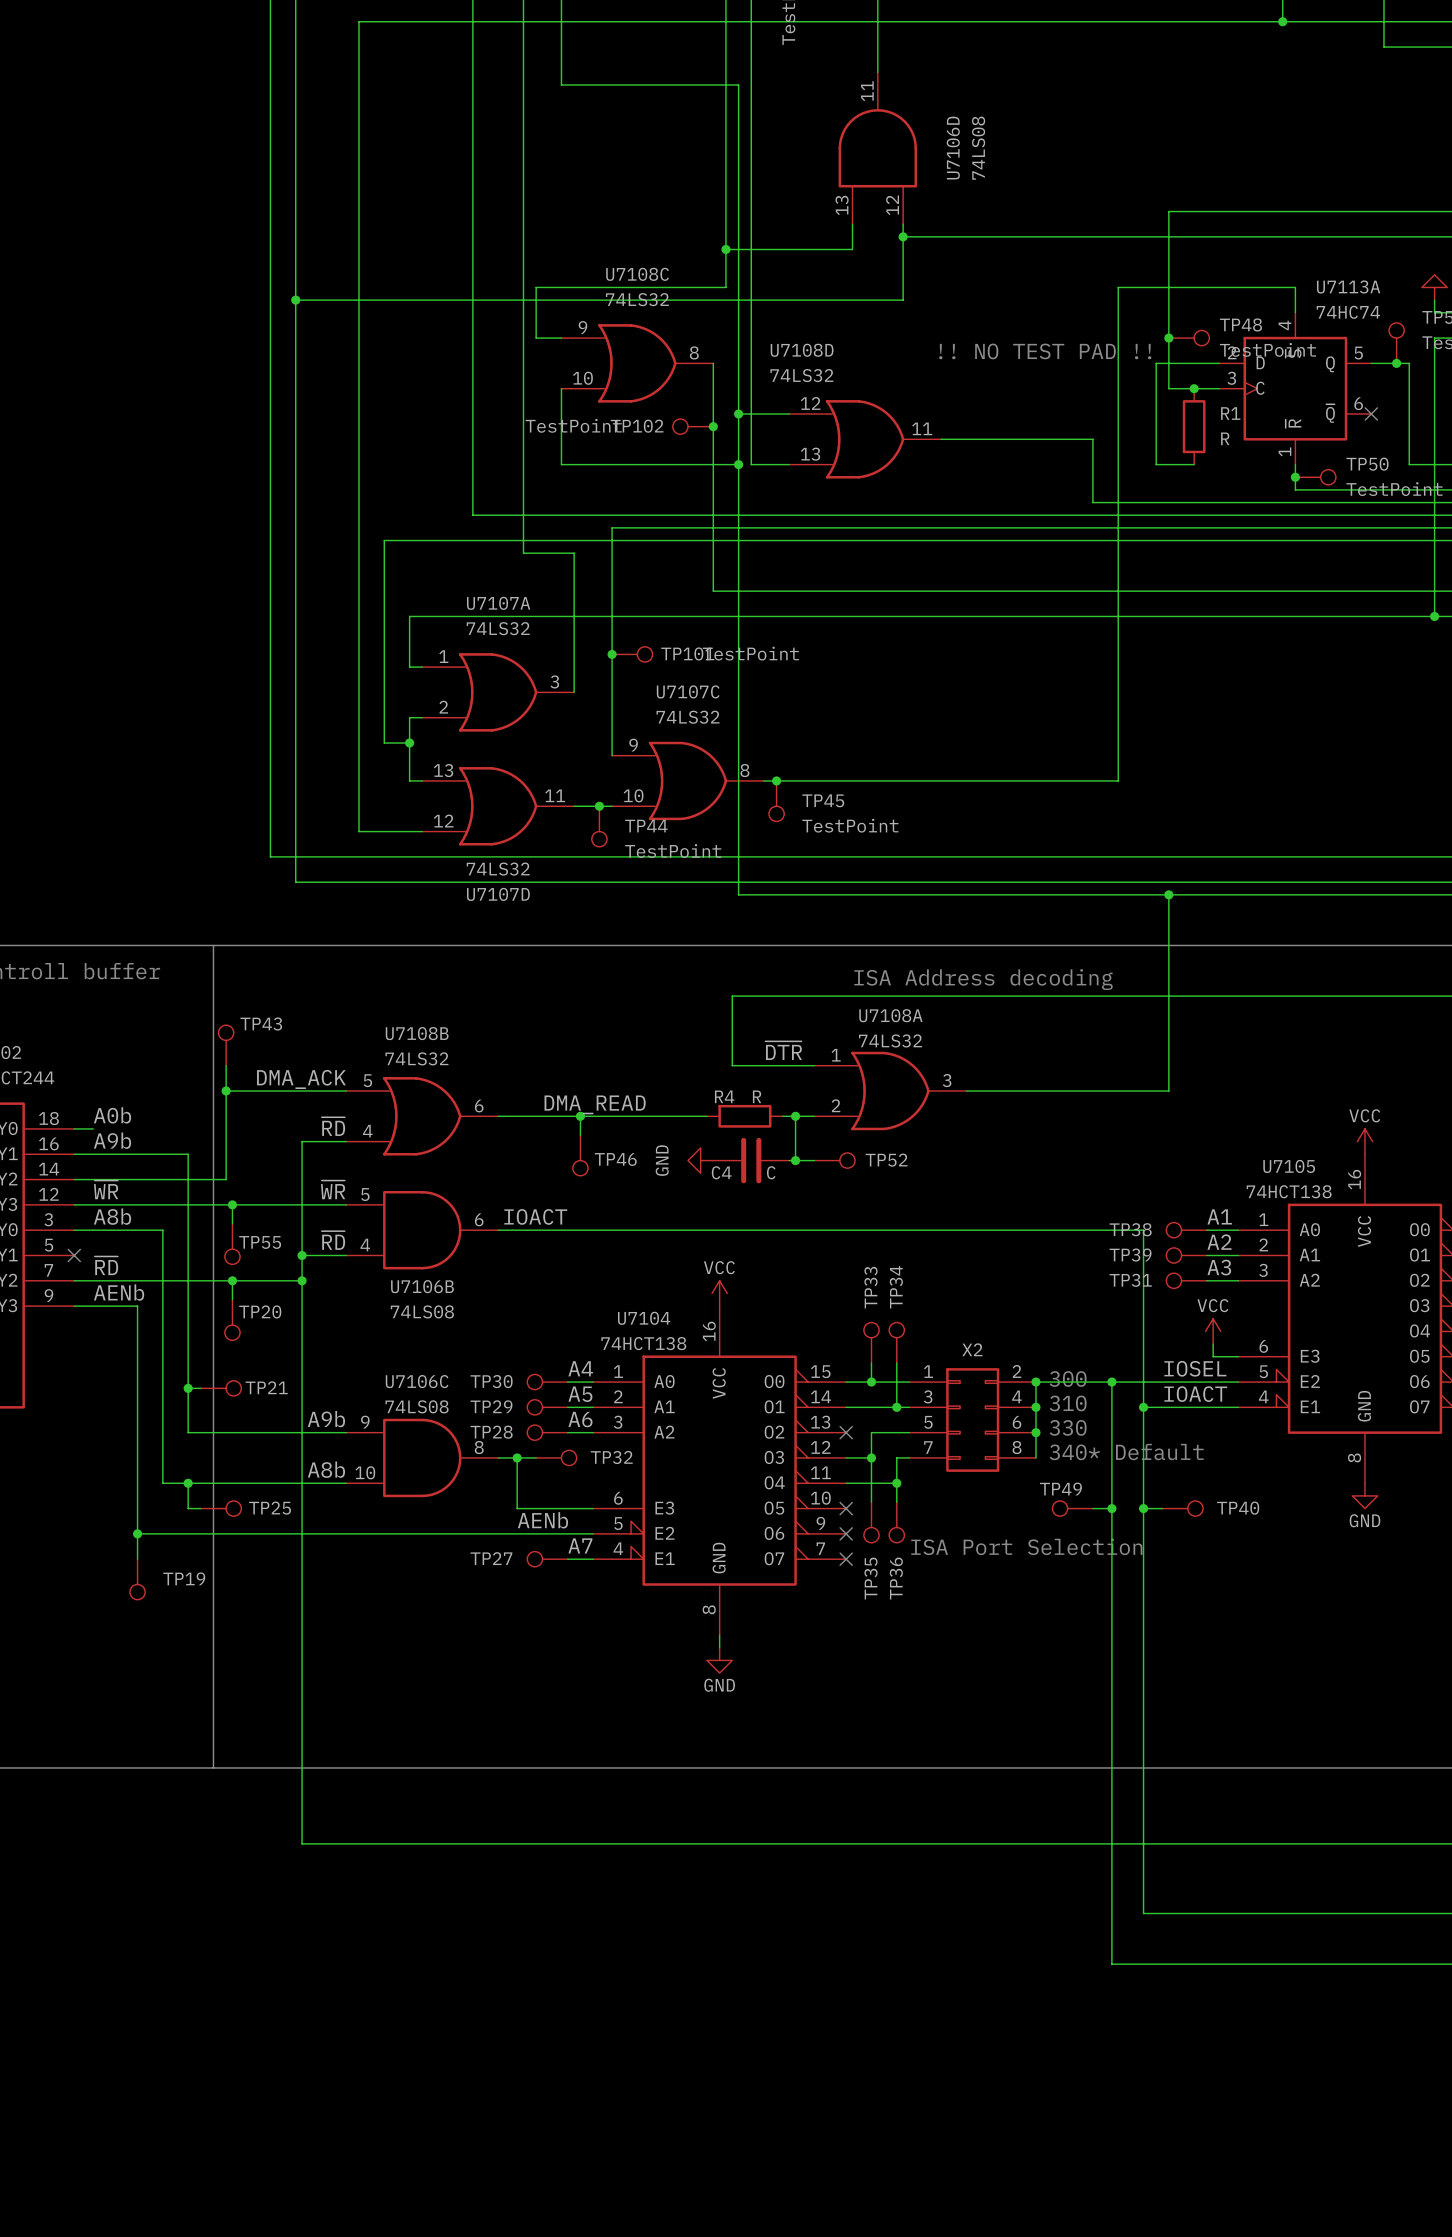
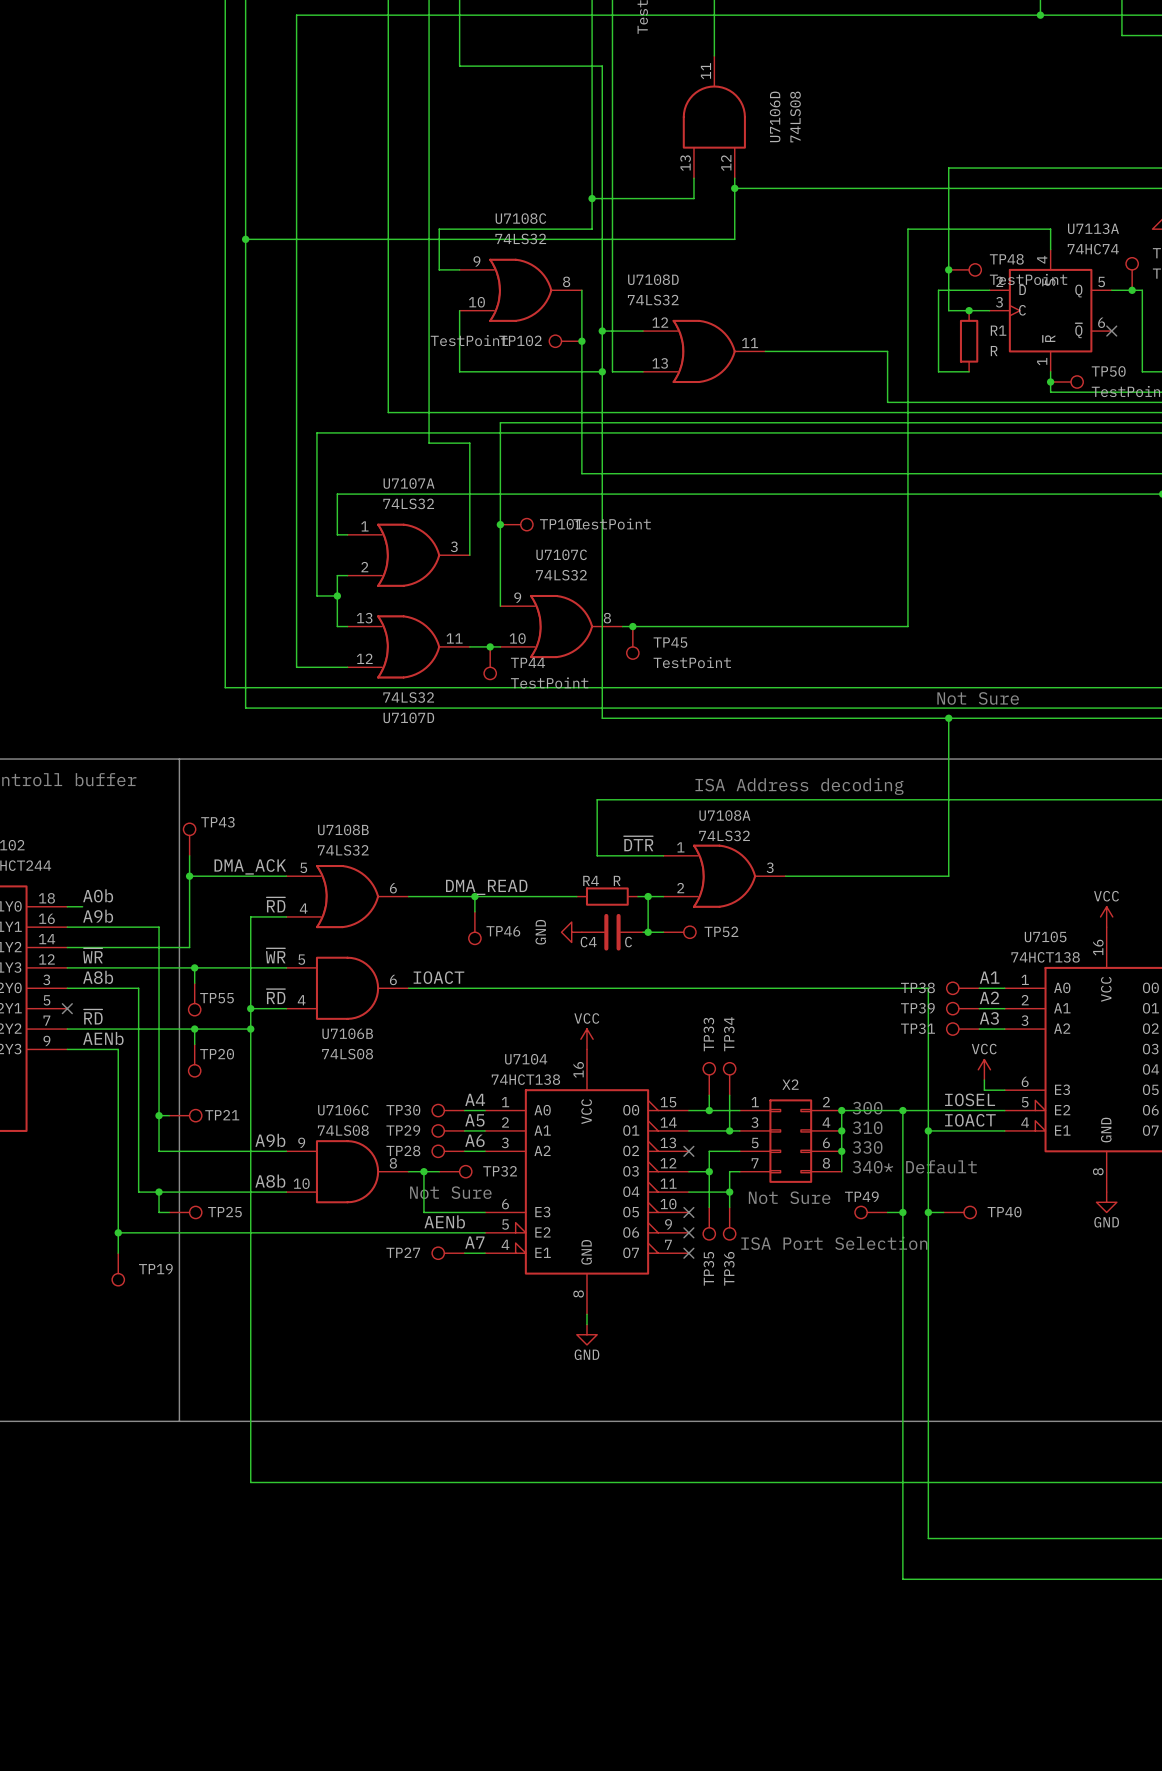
text: !! NO TEST PAD !! (1045, 351) -> none
text: none -> Not Sure (978, 698)
text: none -> Not Sure (450, 1192)
text: none -> Not Sure (789, 1197)

